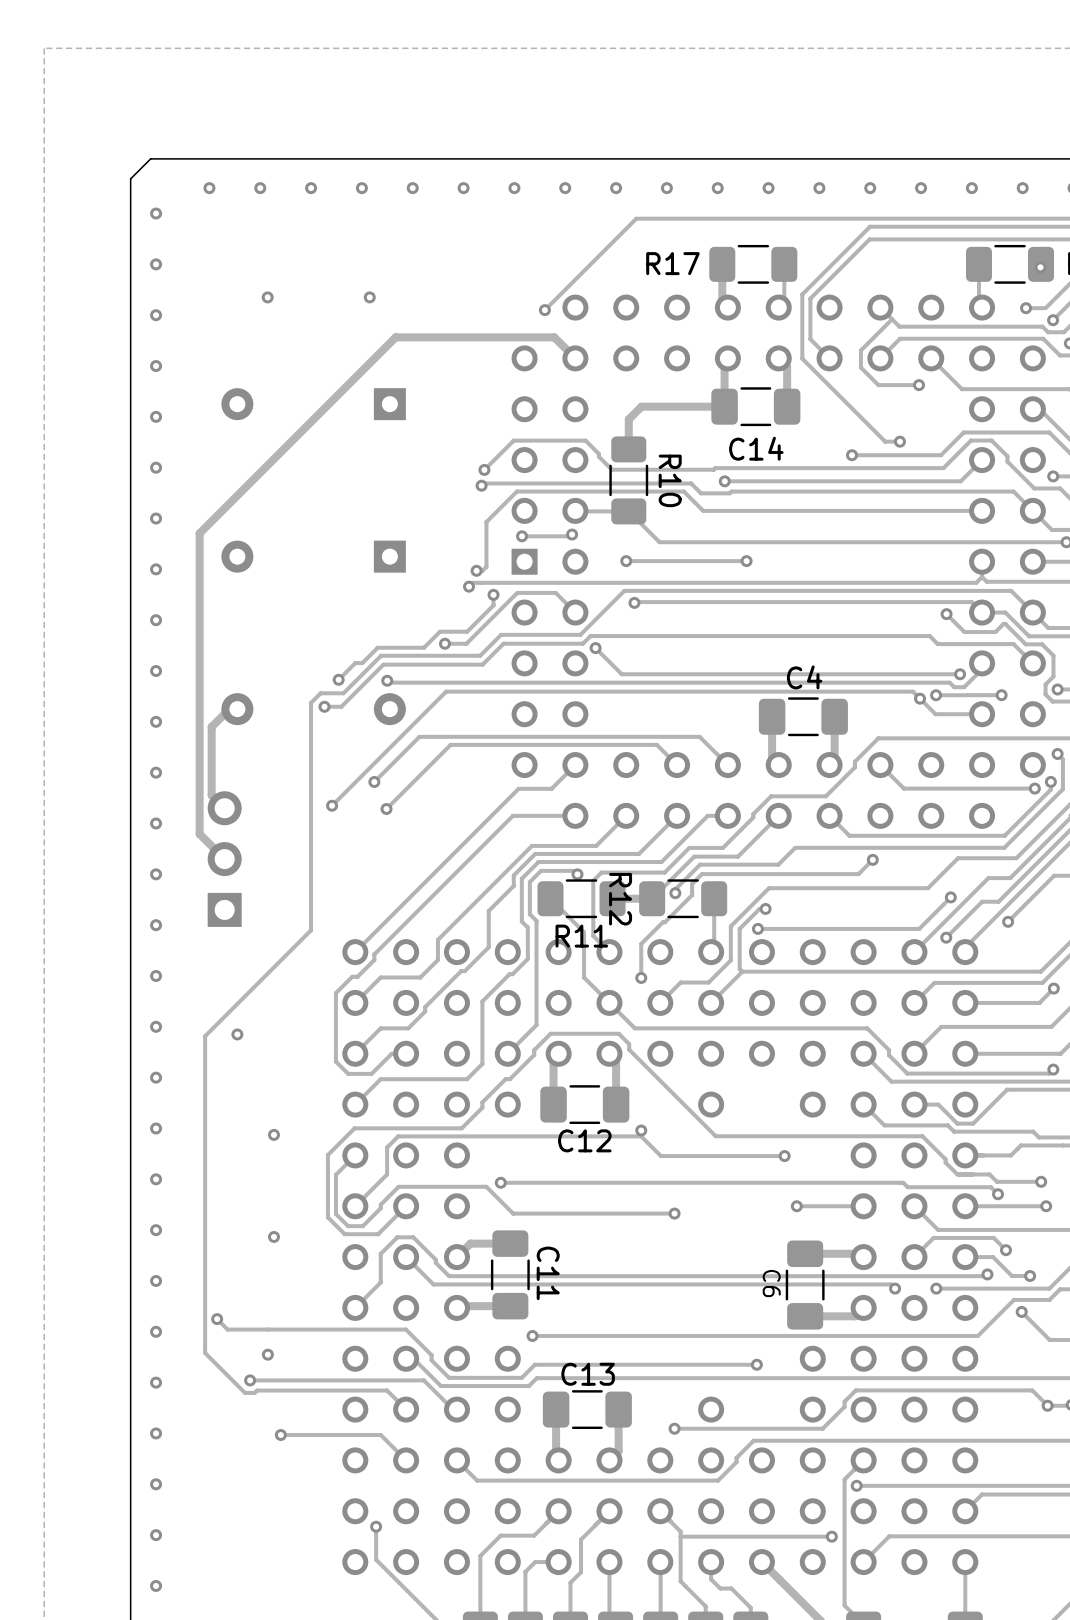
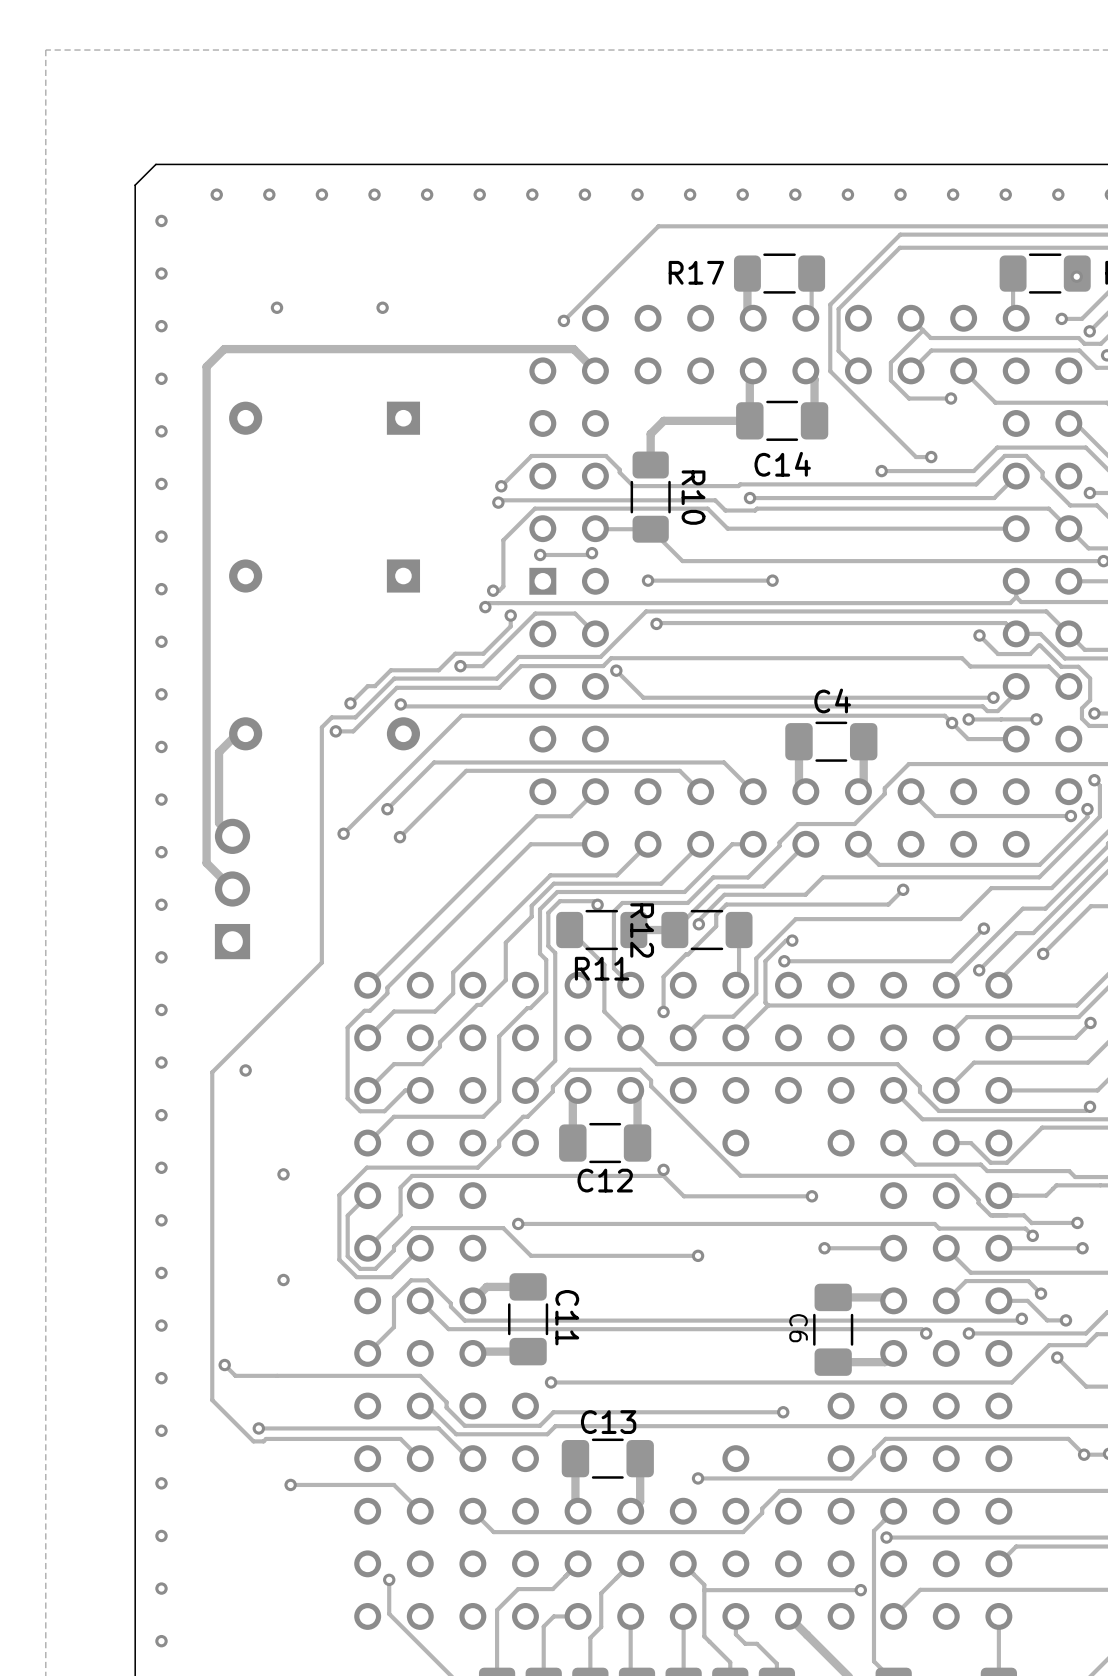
track: (395, 337) (199, 533) -> (409, 349) (224, 349) (206, 366) (206, 551)
via: (267, 1354) -> none

